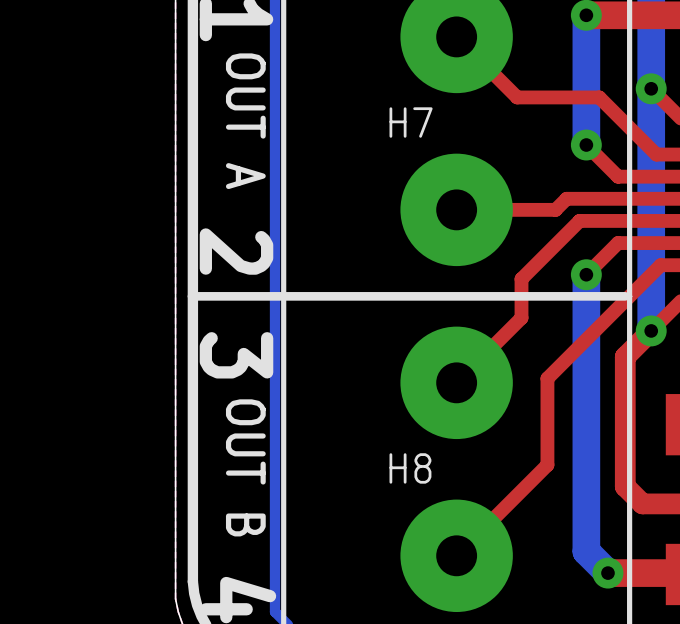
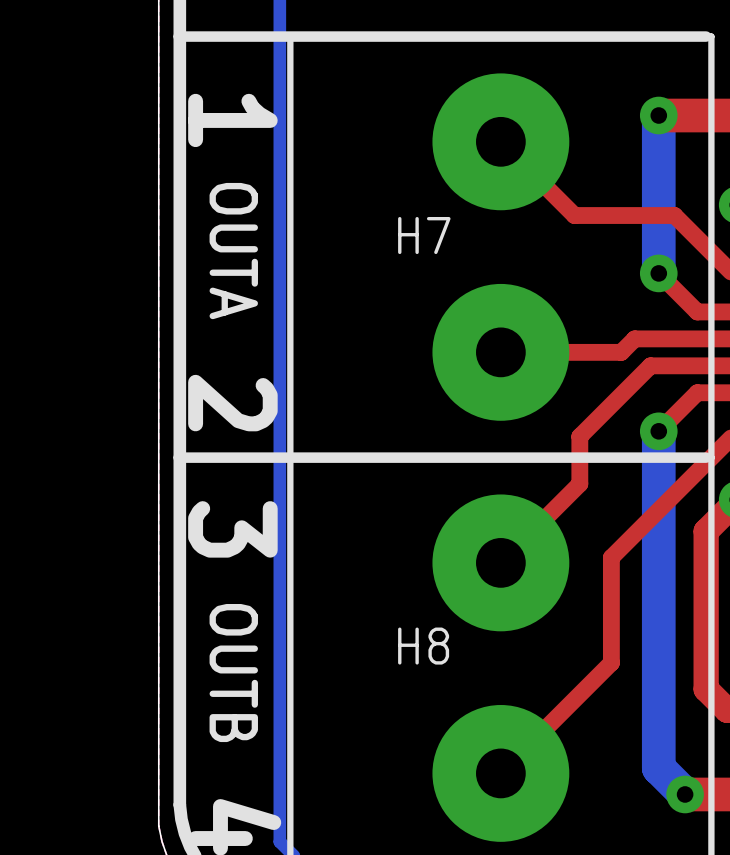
text: OUT A (245, 121) -> OUTA (233, 251)
H7 name position: H7 (411, 122) -> H7 (424, 235)
text: OUT B (245, 467) -> OUTB (233, 673)
H8 name position: H8 (410, 468) -> H8 (423, 646)

